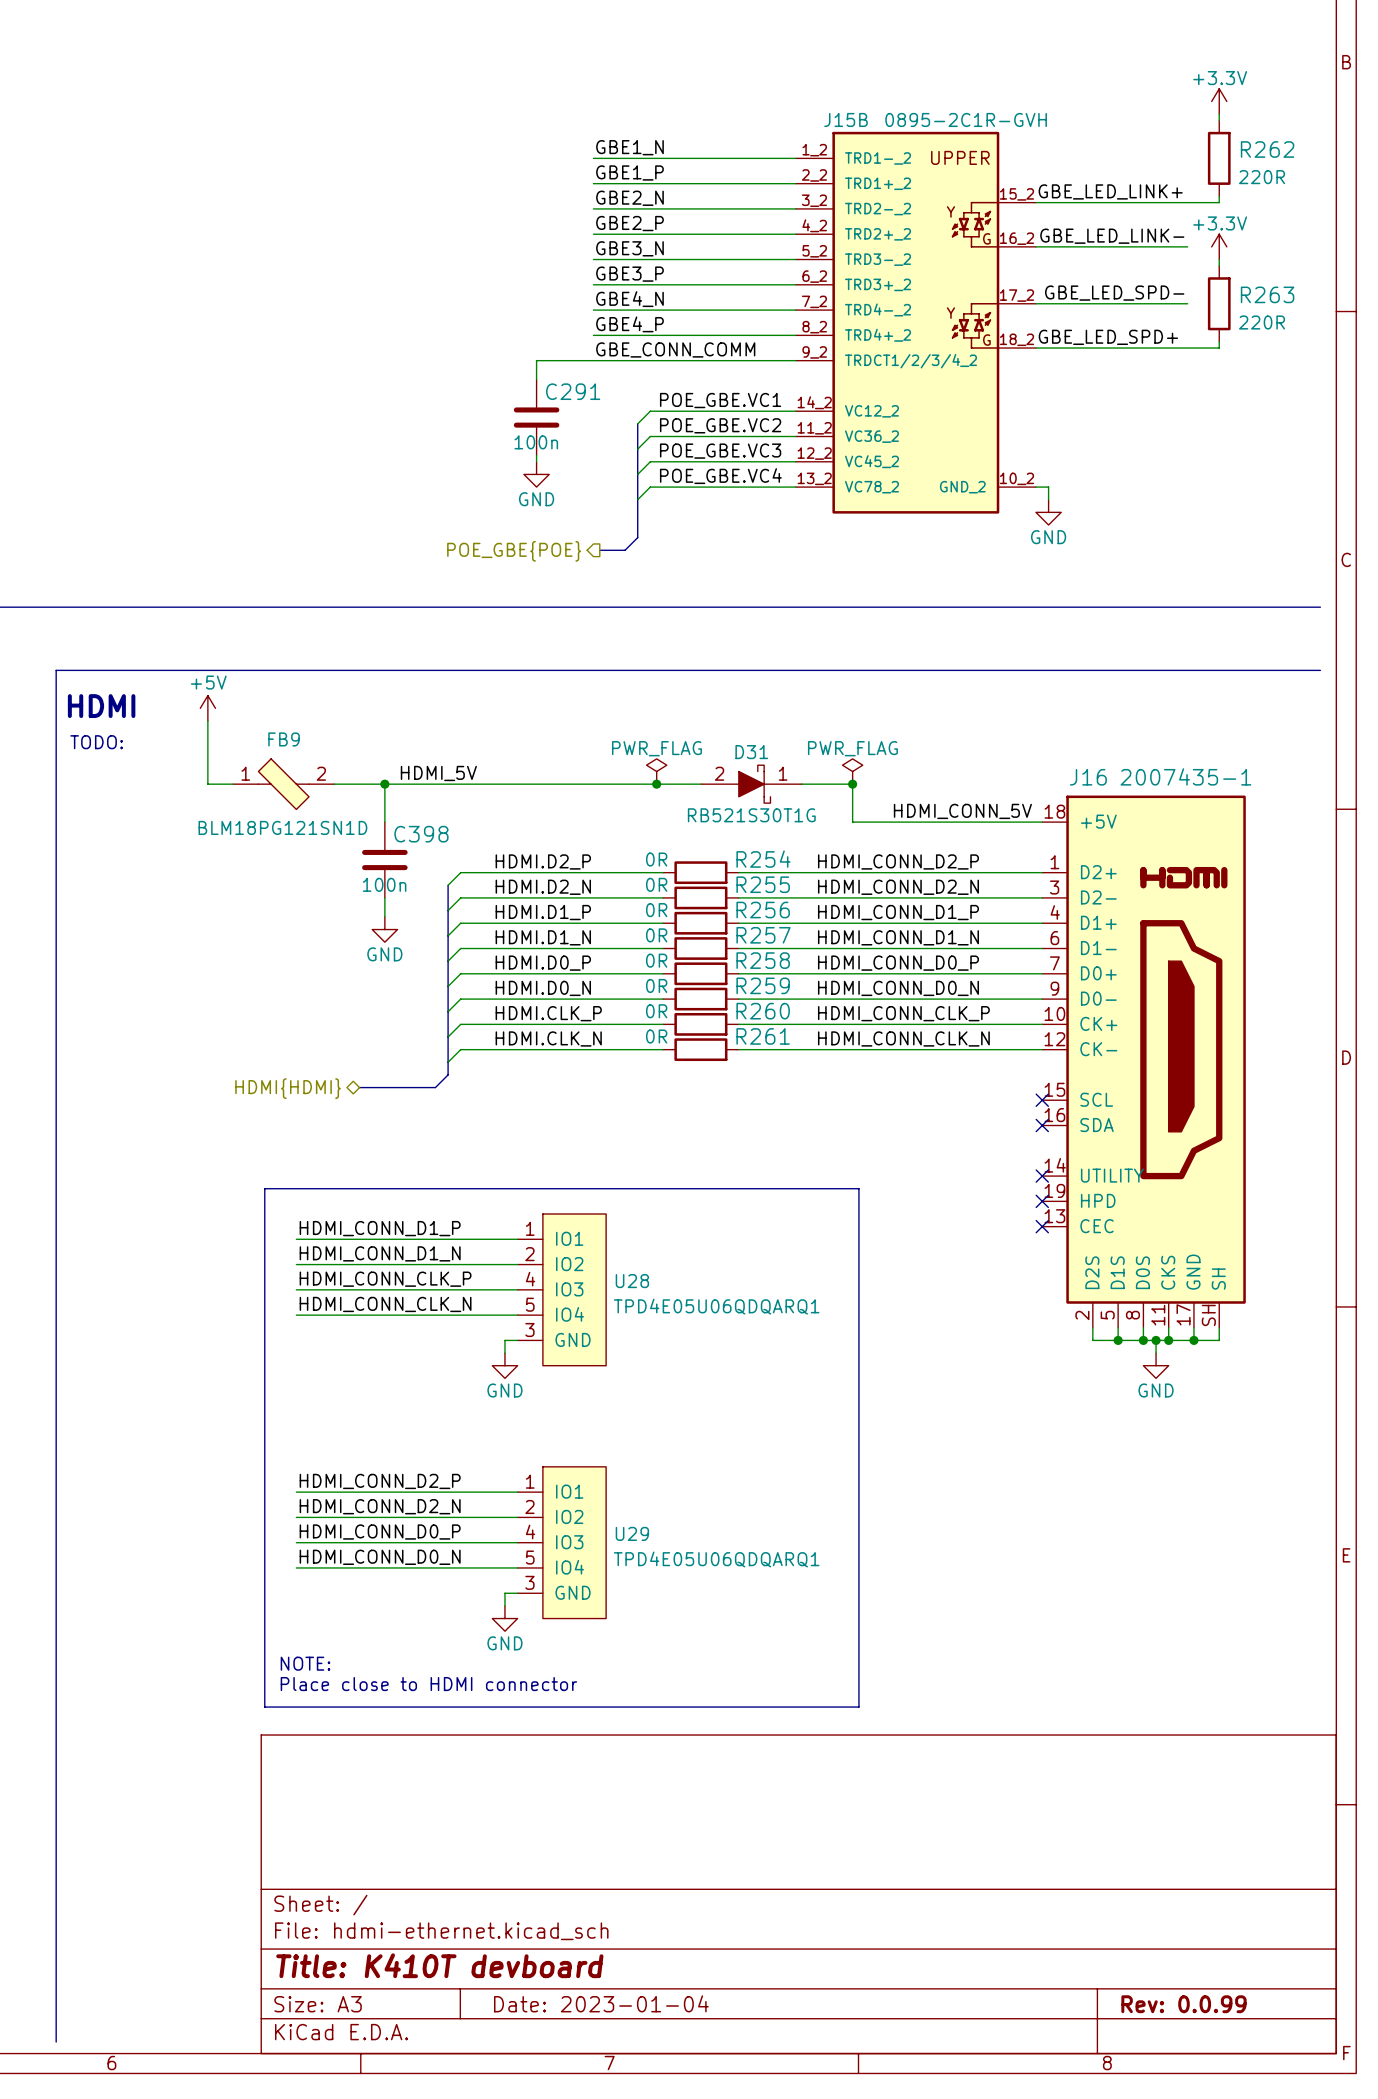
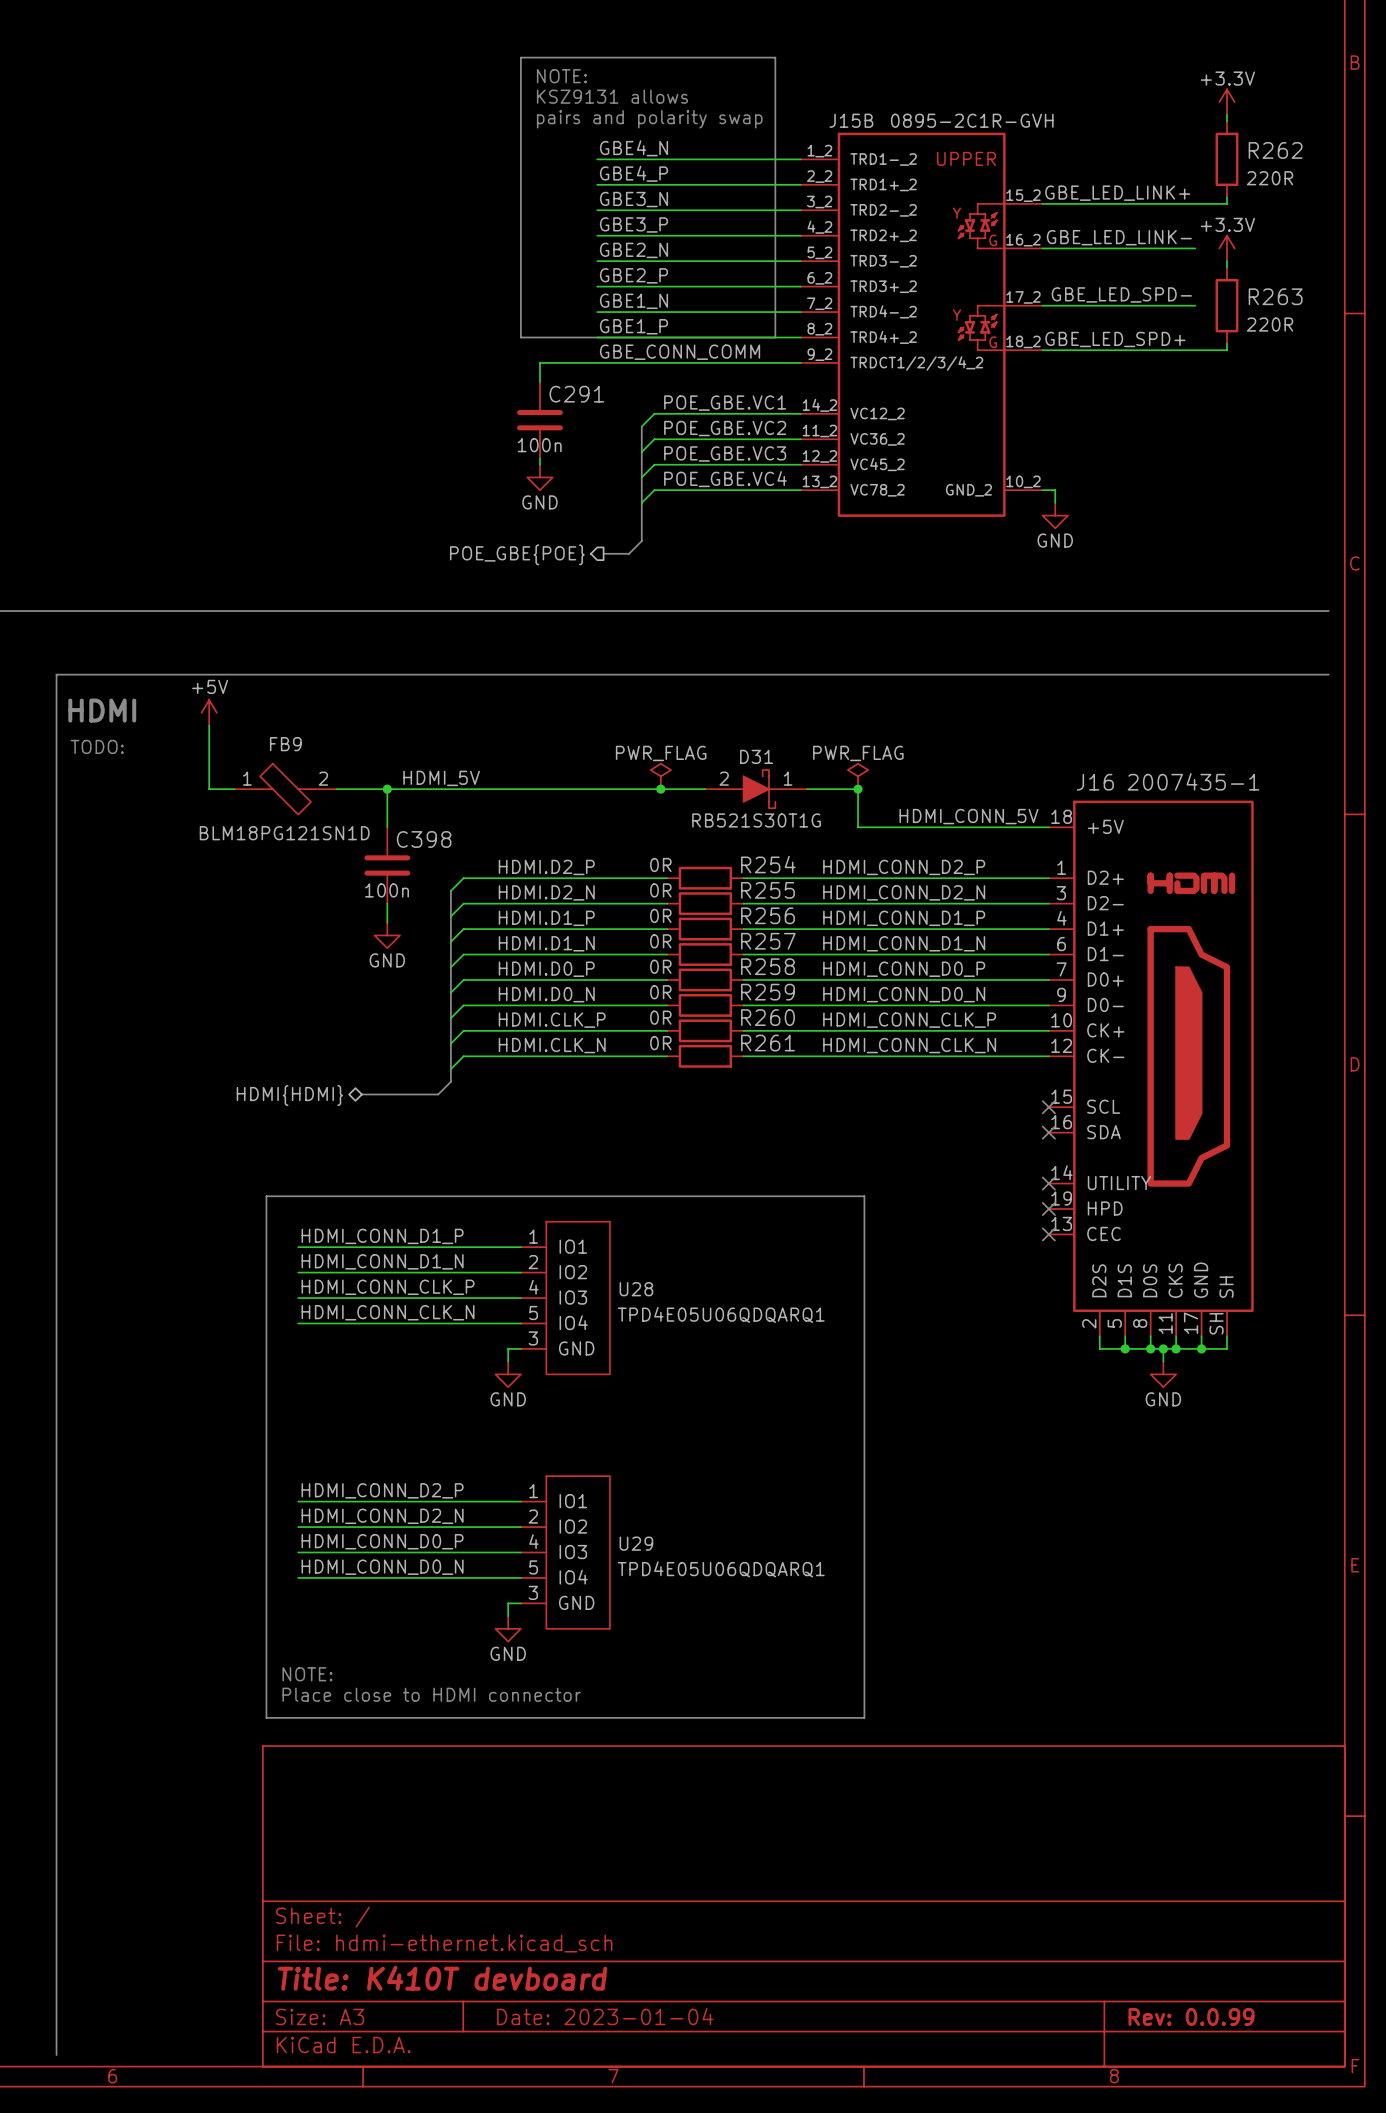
line: none -> (520, 57) (775, 57) (775, 337) (520, 337) (520, 57)
text: none -> NOTE: (561, 76)
text: none -> KSZ9131 allows (612, 96)
text: none -> pairs and polarity swap (649, 119)
label: GBE1_N (629, 147) -> GBE4_N (633, 148)
label: GBE1_P (629, 172) -> GBE4_P (633, 173)
label: GBE2_N (629, 198) -> GBE3_N (633, 199)
label: GBE2_P (629, 223) -> GBE3_P (633, 224)
label: GBE3_N (629, 248) -> GBE2_N (633, 250)
label: GBE3_P (629, 274) -> GBE2_P (633, 275)
label: GBE4_N (629, 299) -> GBE1_N (633, 301)
label: GBE4_P (629, 324) -> GBE1_P (633, 326)

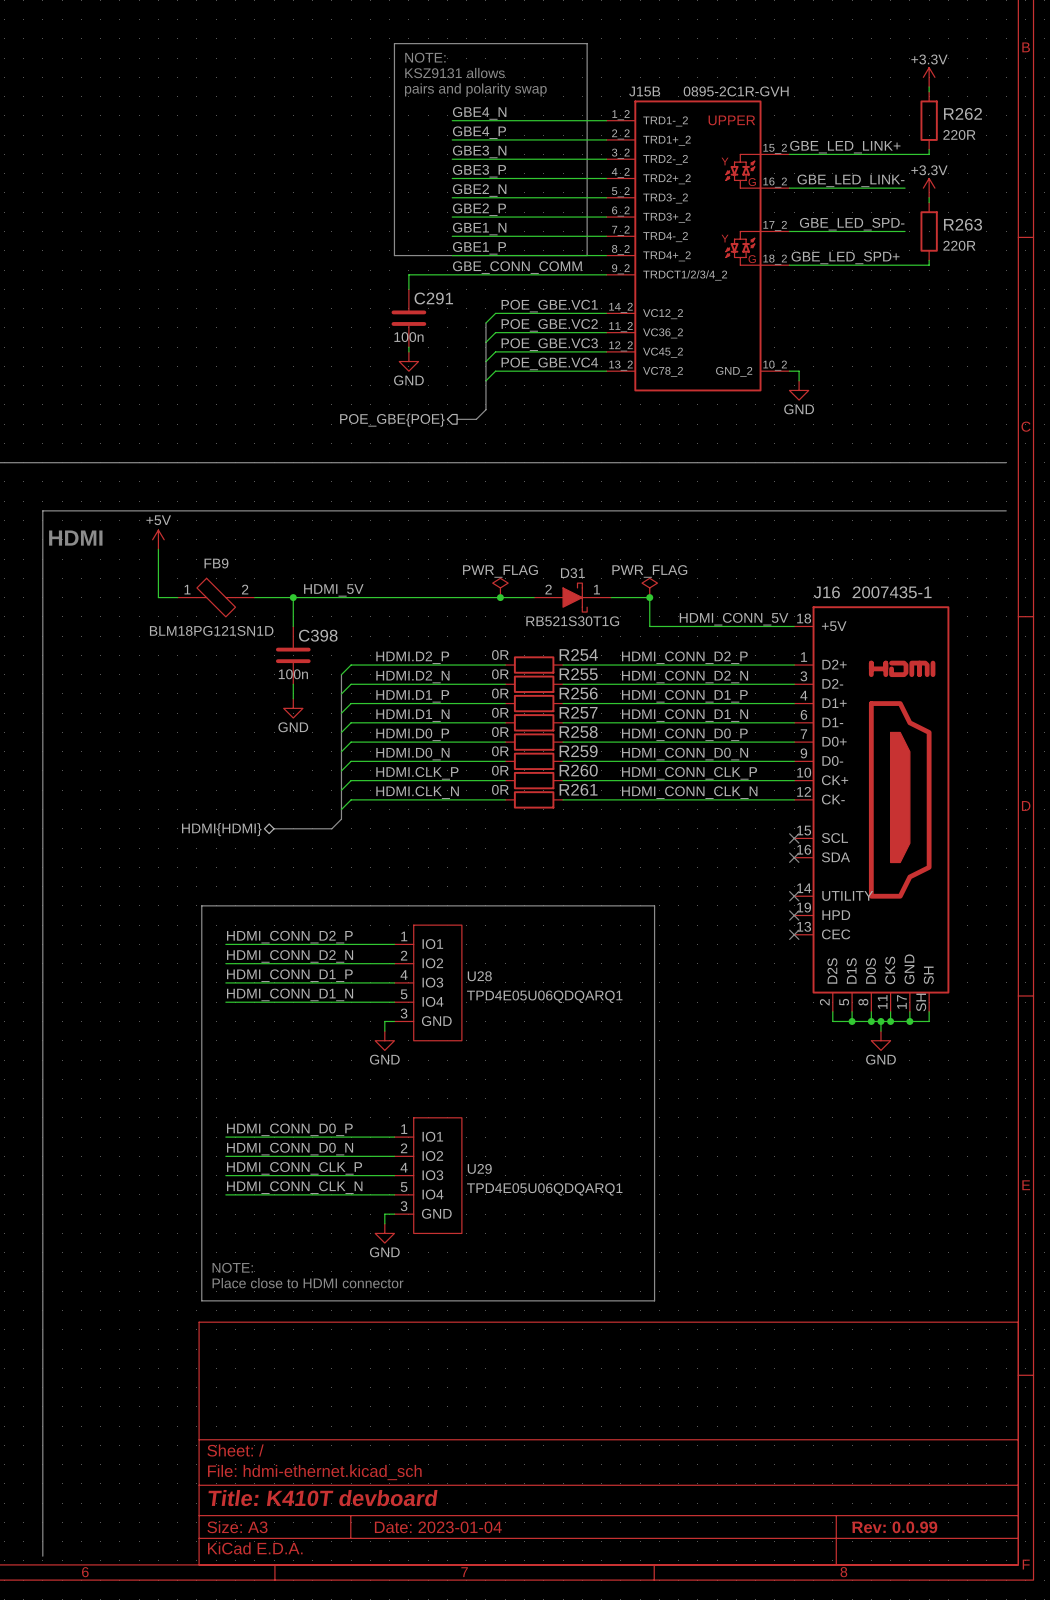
text: TODO: (97, 746) -> none
label: HDMI_CONN_D1_P (382, 1236) -> HDMI_CONN_D2_P (289, 937)
label: HDMI_CONN_D1_N (382, 1261) -> HDMI_CONN_D2_N (290, 956)
label: HDMI_CONN_CLK_P (388, 1287) -> HDMI_CONN_D1_P (289, 975)
label: HDMI_CONN_CLK_N (388, 1312) -> HDMI_CONN_D1_N (290, 994)
label: HDMI_CONN_D2_P (382, 1490) -> HDMI_CONN_D0_P (289, 1129)
label: HDMI_CONN_D2_N (382, 1516) -> HDMI_CONN_D0_N (290, 1149)
label: HDMI_CONN_D0_P (382, 1541) -> HDMI_CONN_CLK_P (294, 1168)
label: HDMI_CONN_D0_N (382, 1567) -> HDMI_CONN_CLK_N (294, 1187)

